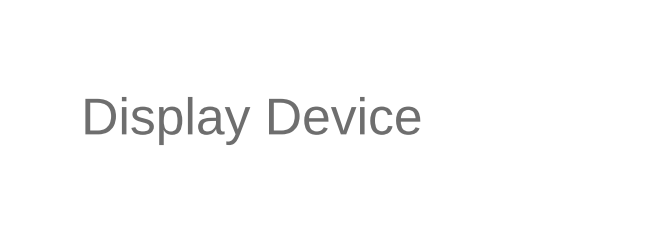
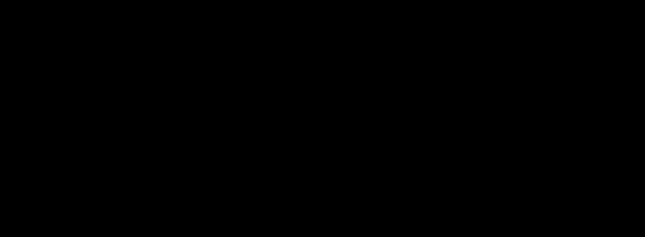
label: Display Device (252, 121) -> none

